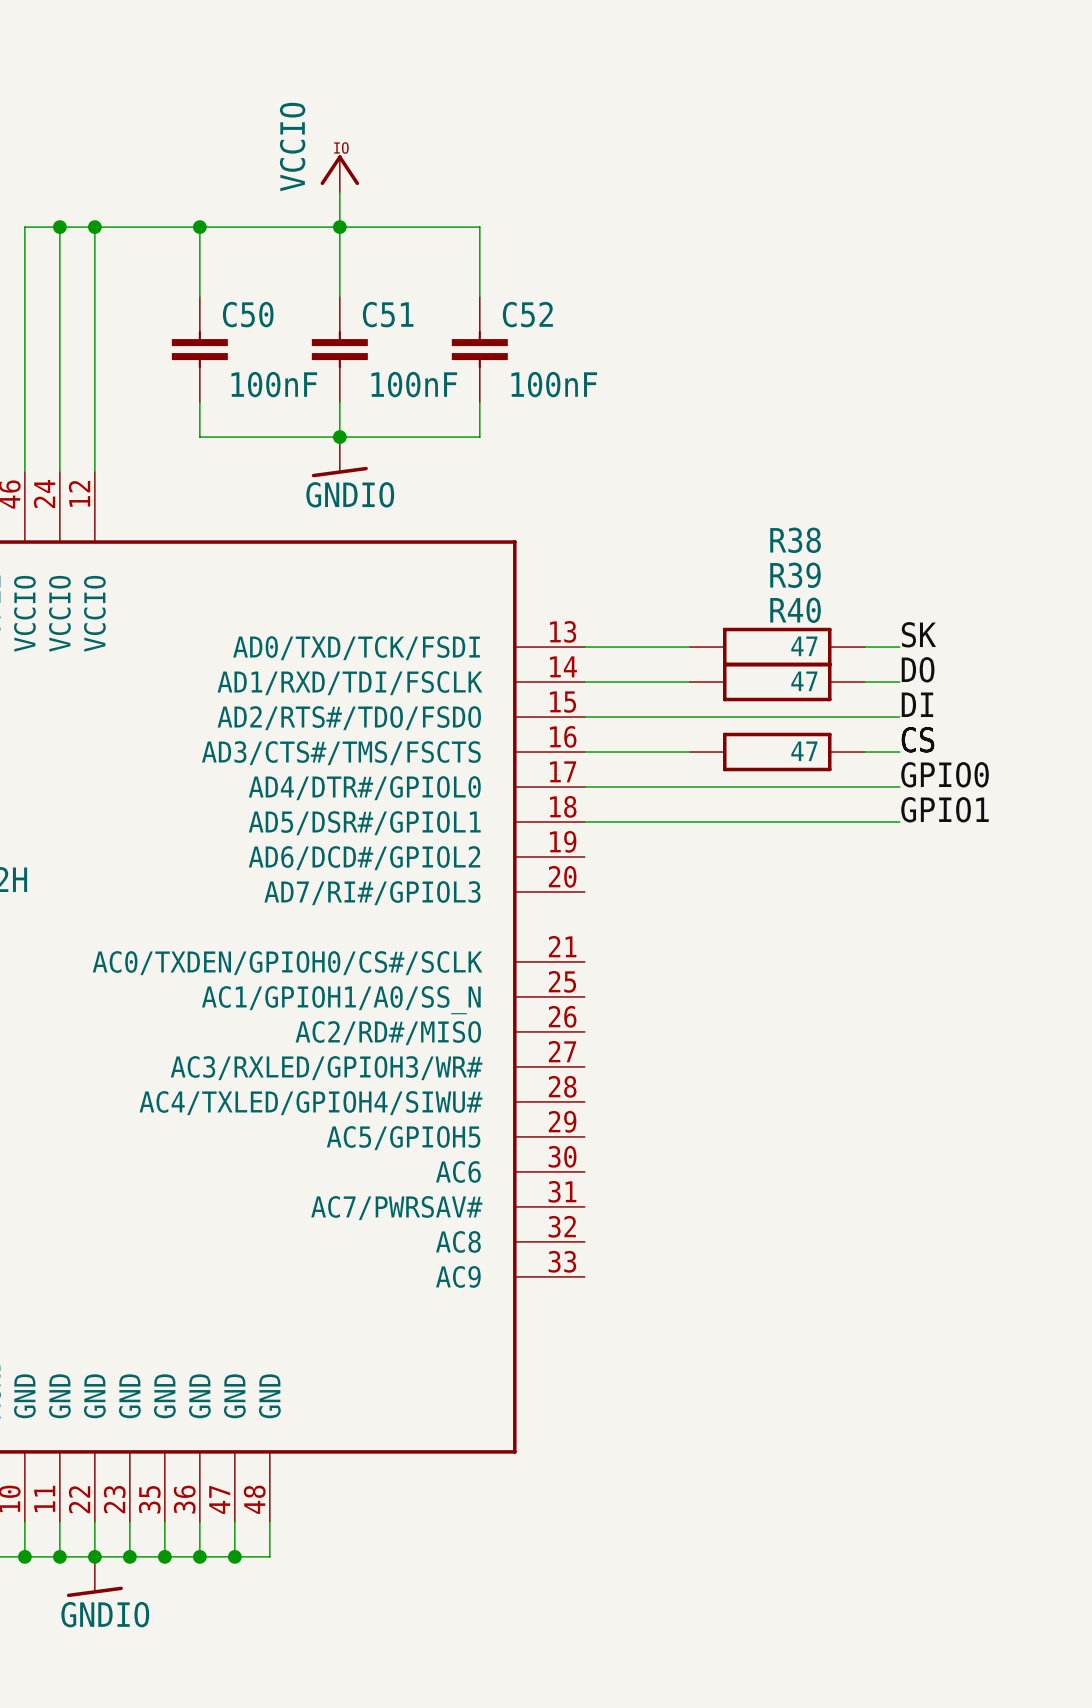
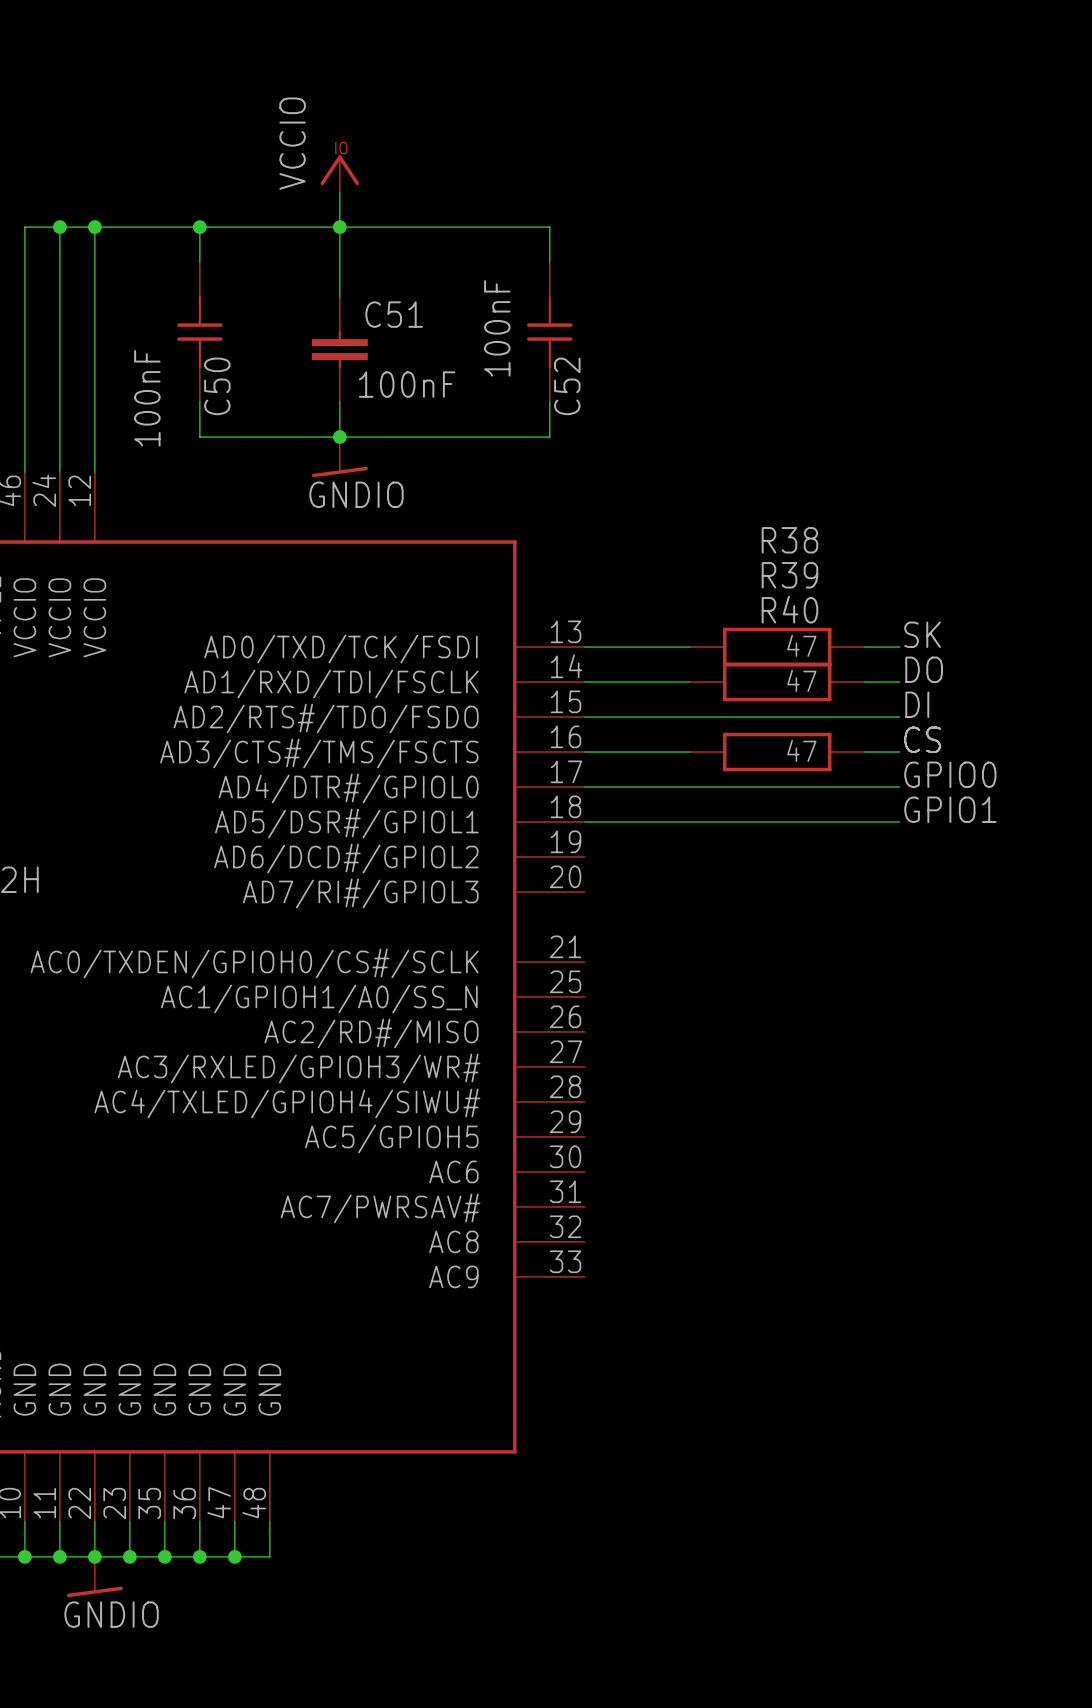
wire: (479, 227) (479, 297) -> (479, 227) (549, 227) (549, 262)
C50 symbol: [171, 297, 228, 403] -> [177, 262, 223, 403]
C52 symbol: [451, 297, 508, 403] -> [527, 262, 573, 403]
C50 name position: C50 (248, 314) -> C50 (217, 386)
C52 name position: C52 (527, 314) -> C52 (567, 386)
C50 value position: 100nF (274, 384) -> 100nF (147, 398)
C52 value position: 100nF (554, 384) -> 100nF (497, 328)
wire: (479, 402) (479, 437) -> (549, 402) (549, 437) (479, 437)

